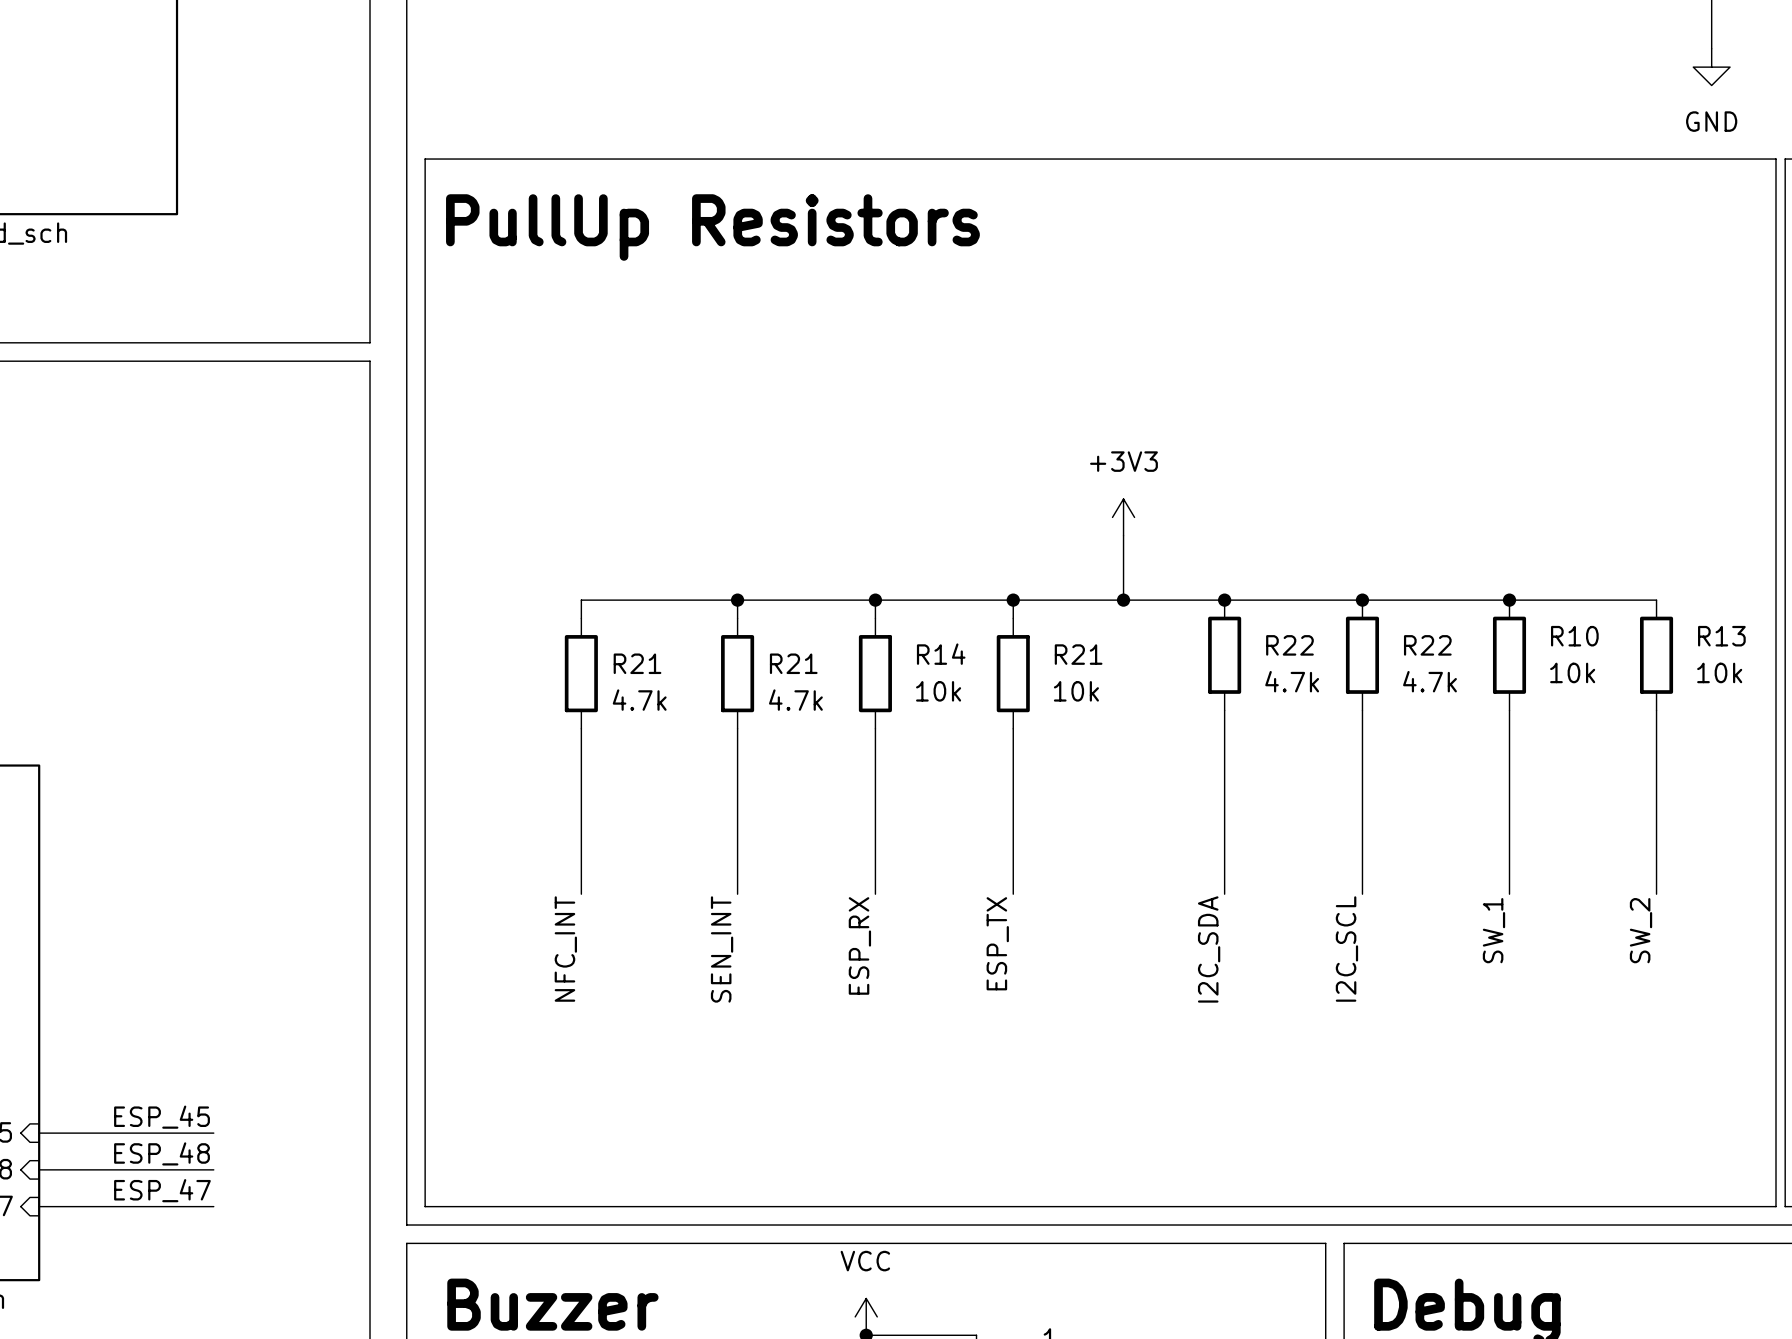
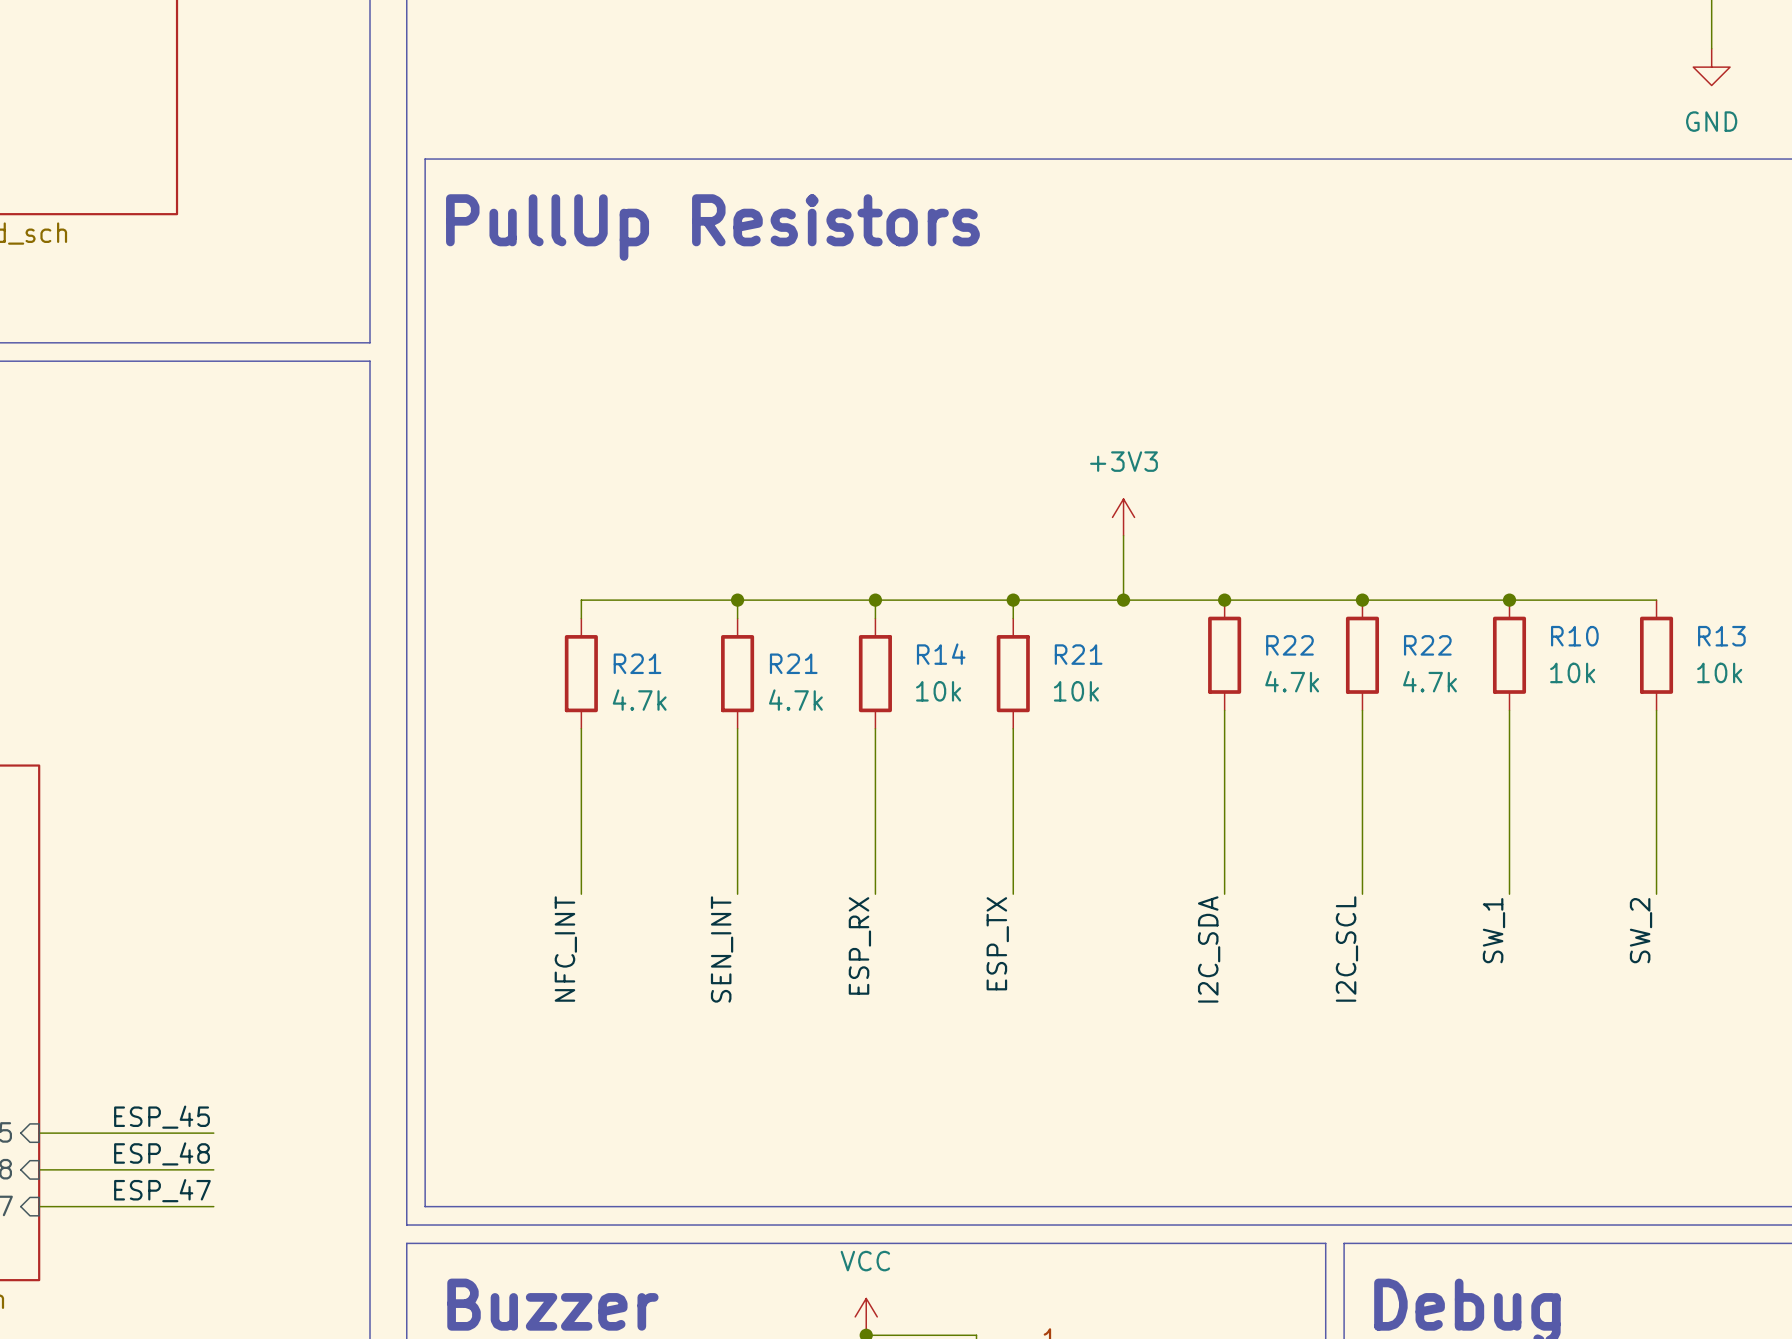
line: (1776, 159) (1776, 1206) -> (1776, 159) (1785, 159)
line: (1785, 159) (1785, 1206) -> (1776, 1206) (1785, 1206)

